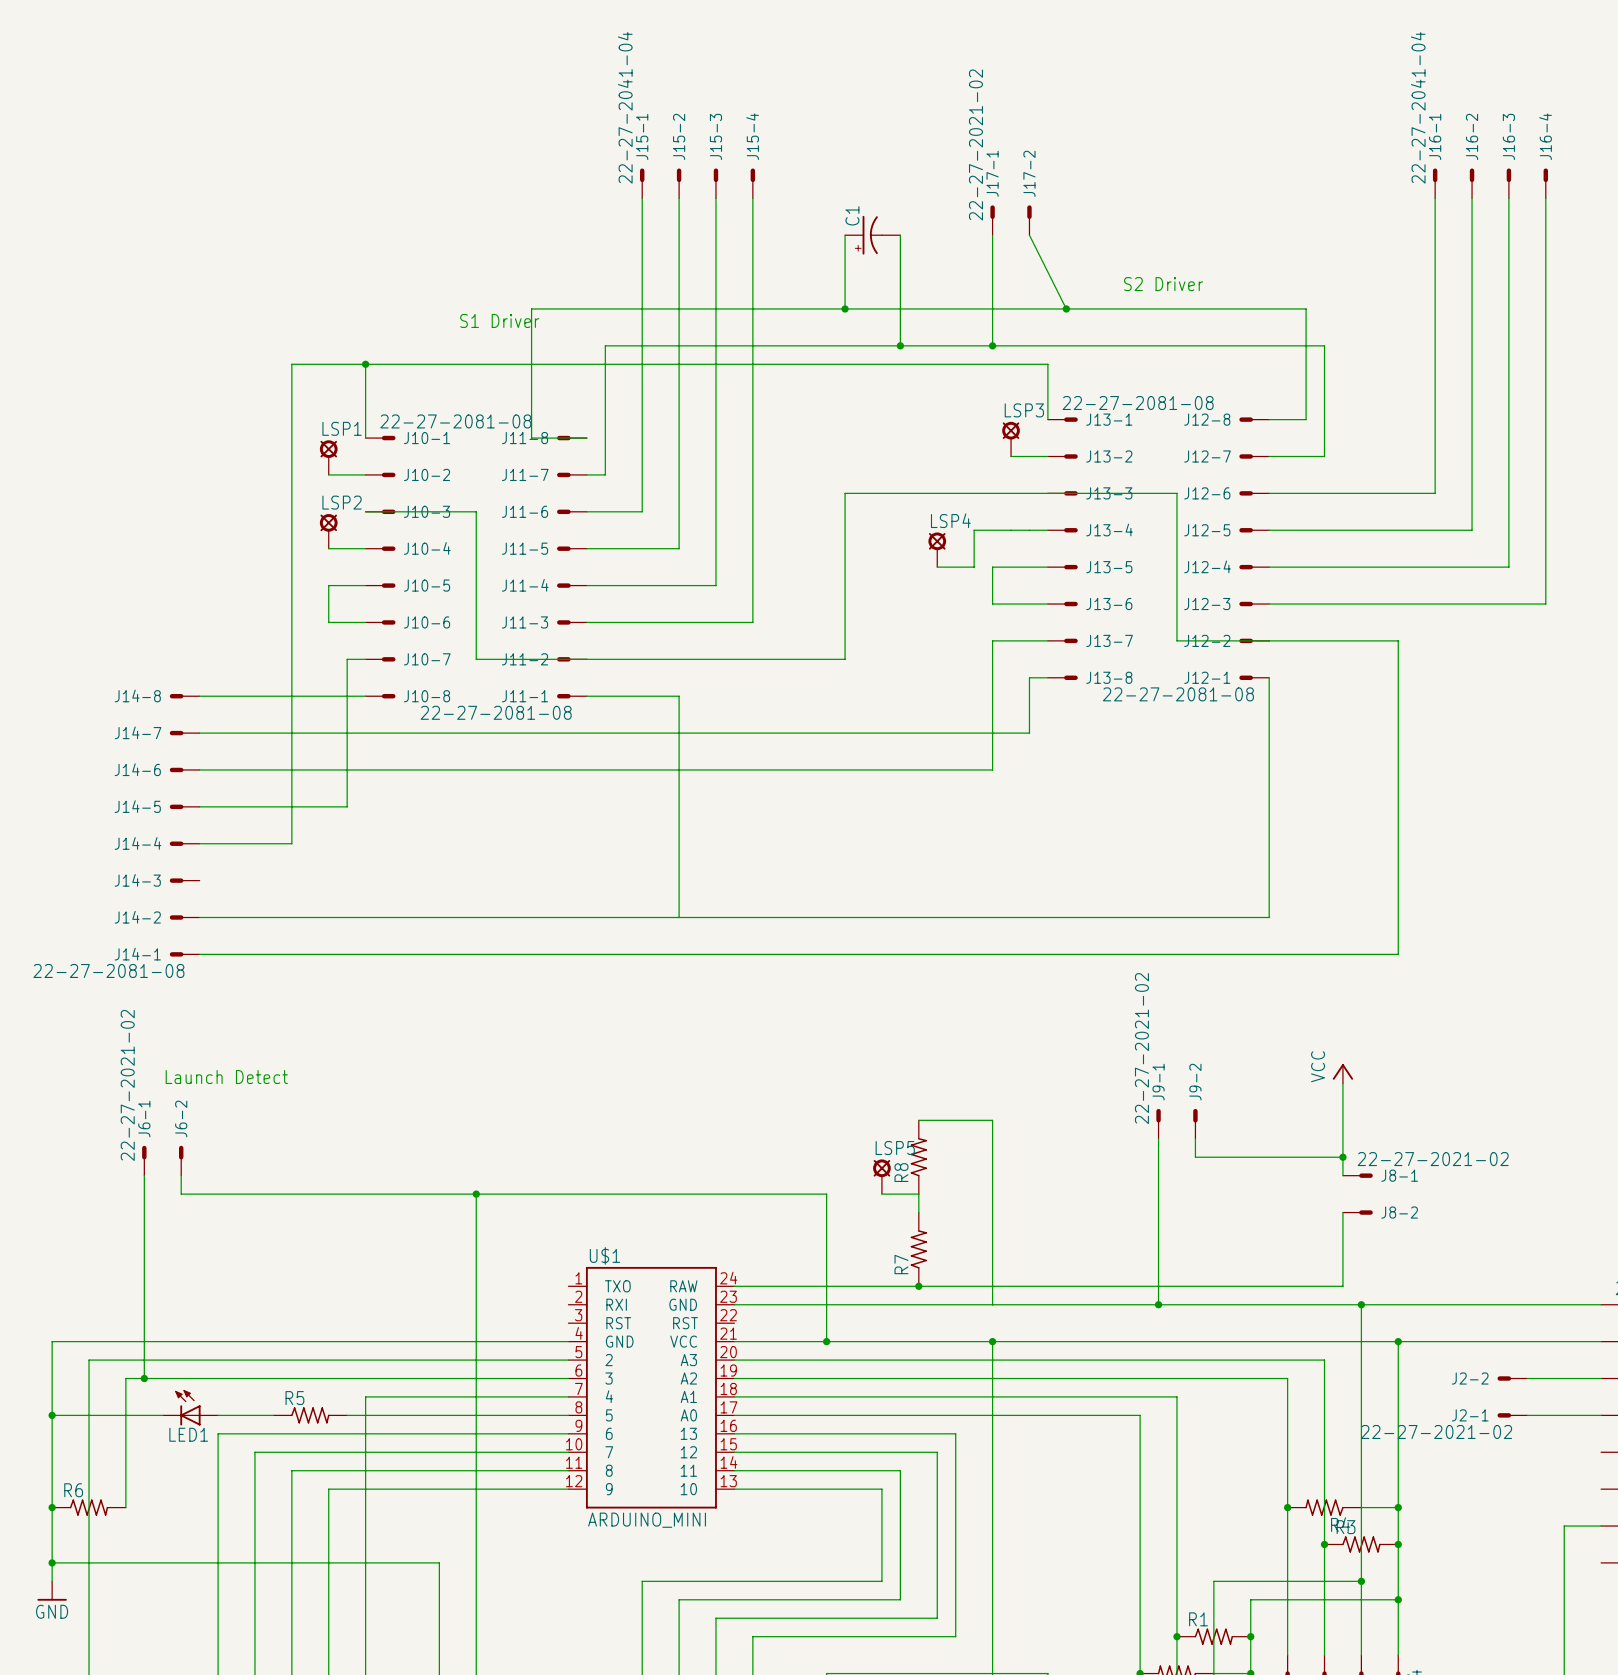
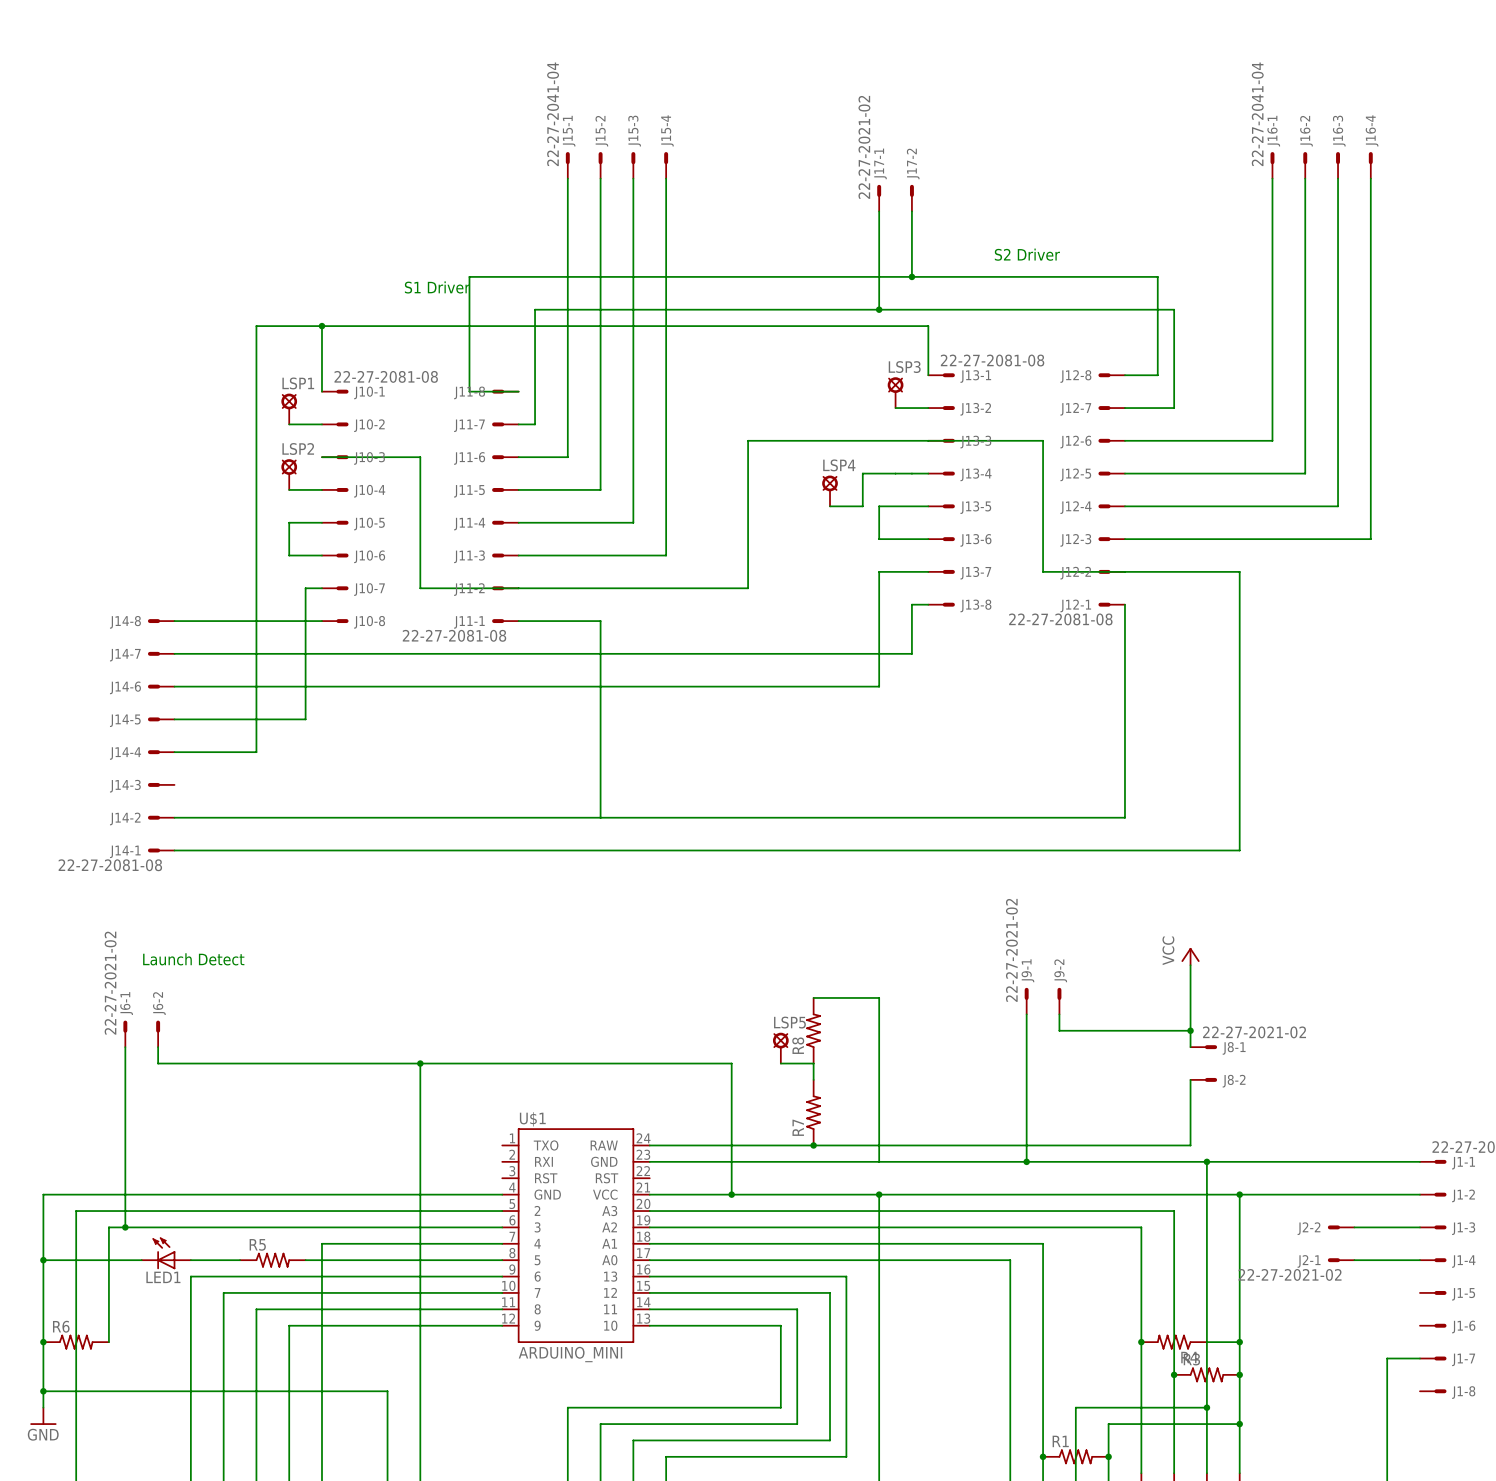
wire: (845, 235) (845, 308) -> none
C1: (872, 235) -> none
wire: (900, 235) (900, 345) -> none
wire: (1029, 235) (1066, 308) -> (911, 211) (911, 276)
junction: (845, 308) -> none
junction position: (1066, 308) -> (911, 276)
junction: (900, 345) -> none

